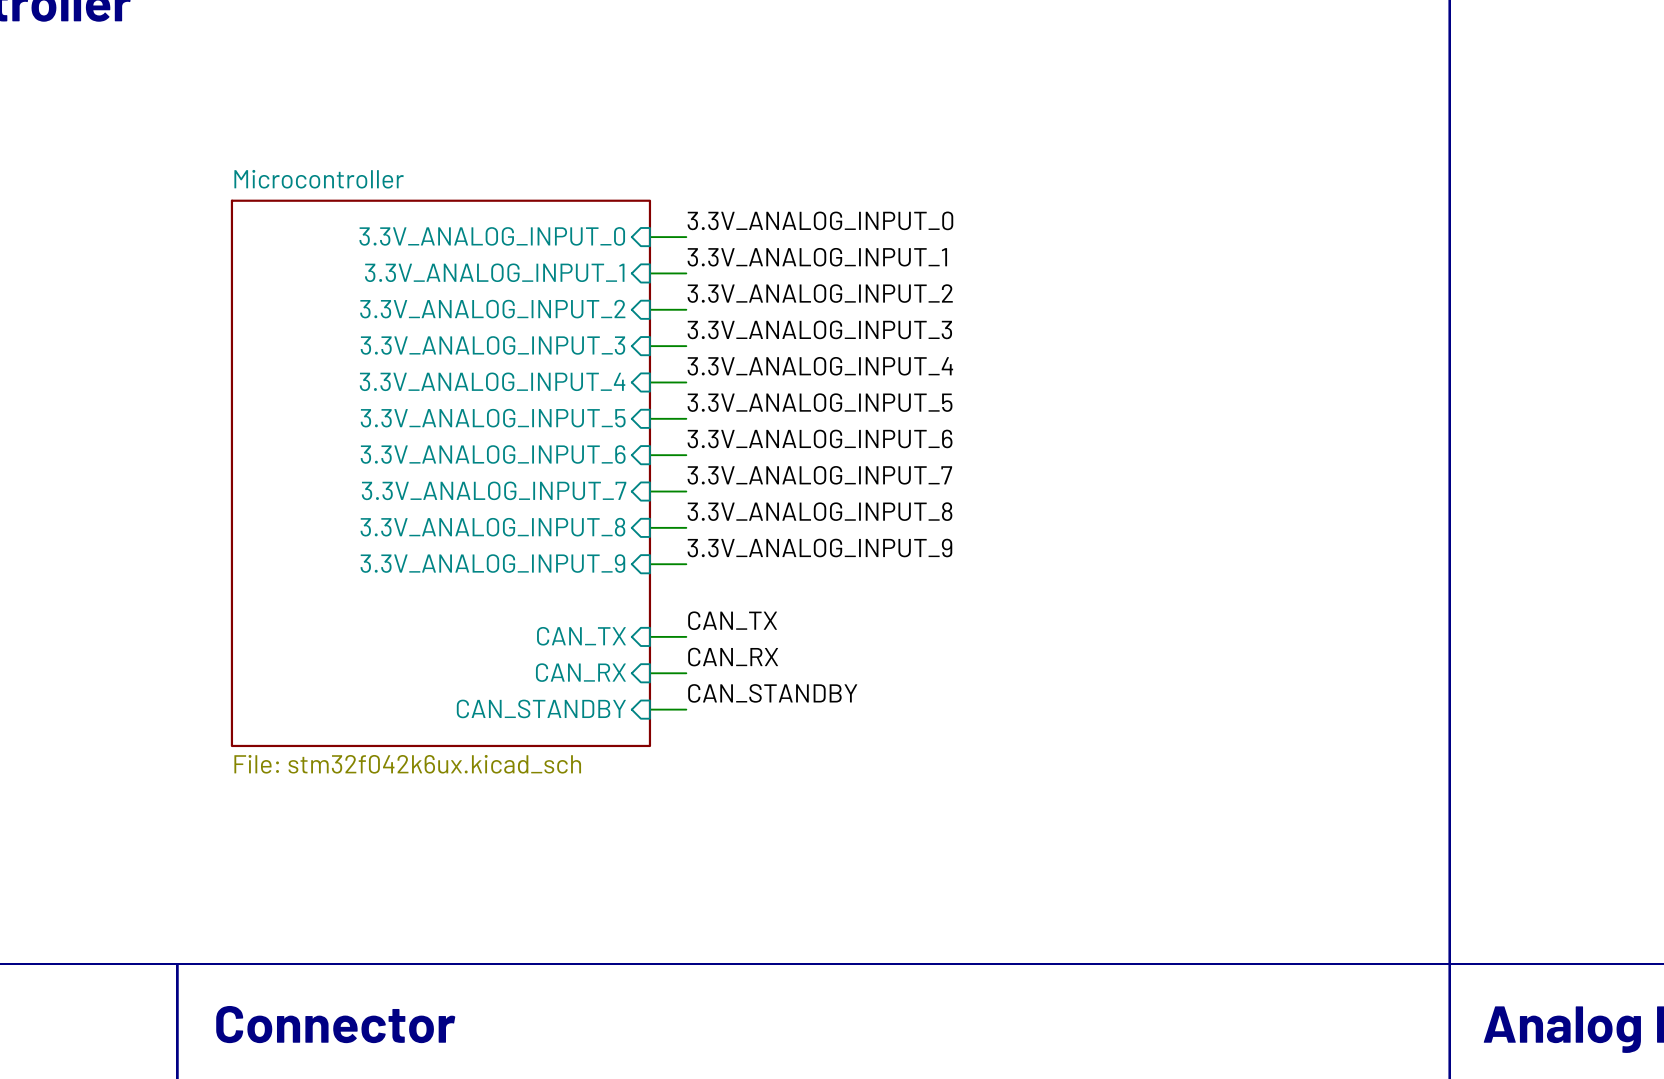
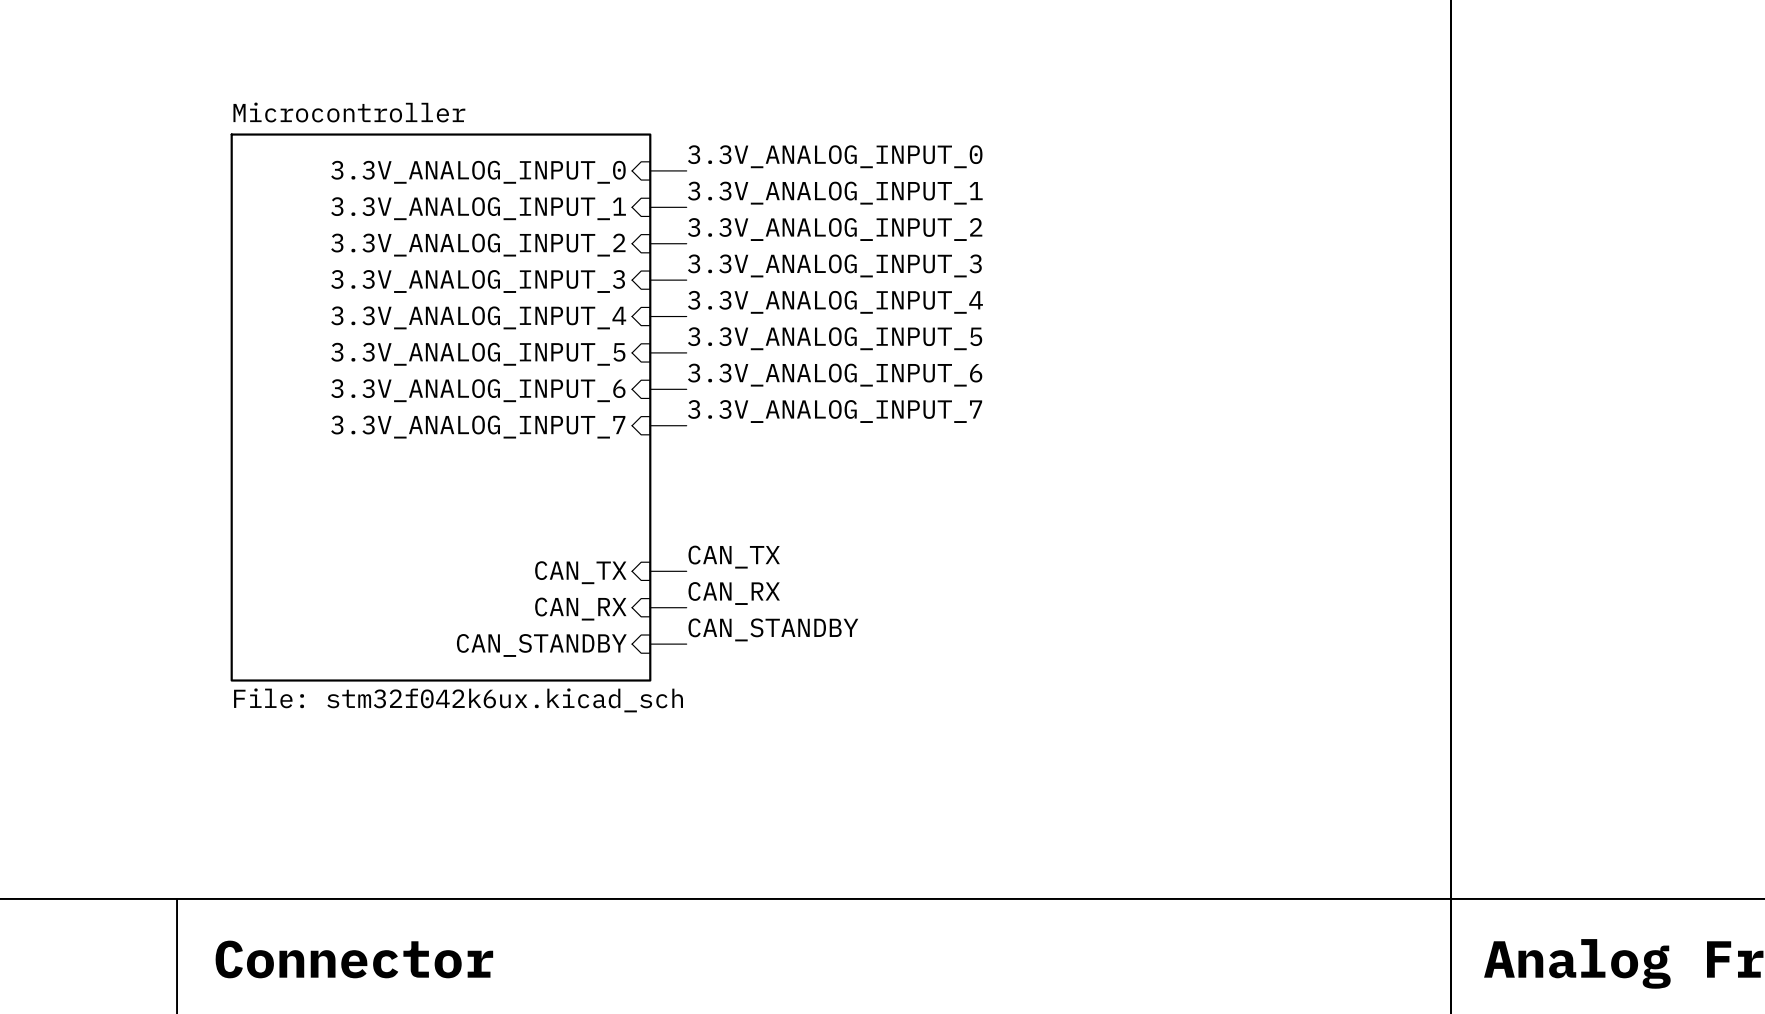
label: 3.3V_ANALOG_INPUT_8 (819, 511) -> none
sheet pin: 3.3V_ANALOG_INPUT_8 (492, 527) -> none
wire: (649, 527) (686, 527) -> none
label: 3.3V_ANALOG_INPUT_9 (819, 548) -> none
sheet pin: 3.3V_ANALOG_INPUT_9 (492, 563) -> none
wire: (649, 564) (686, 564) -> none

